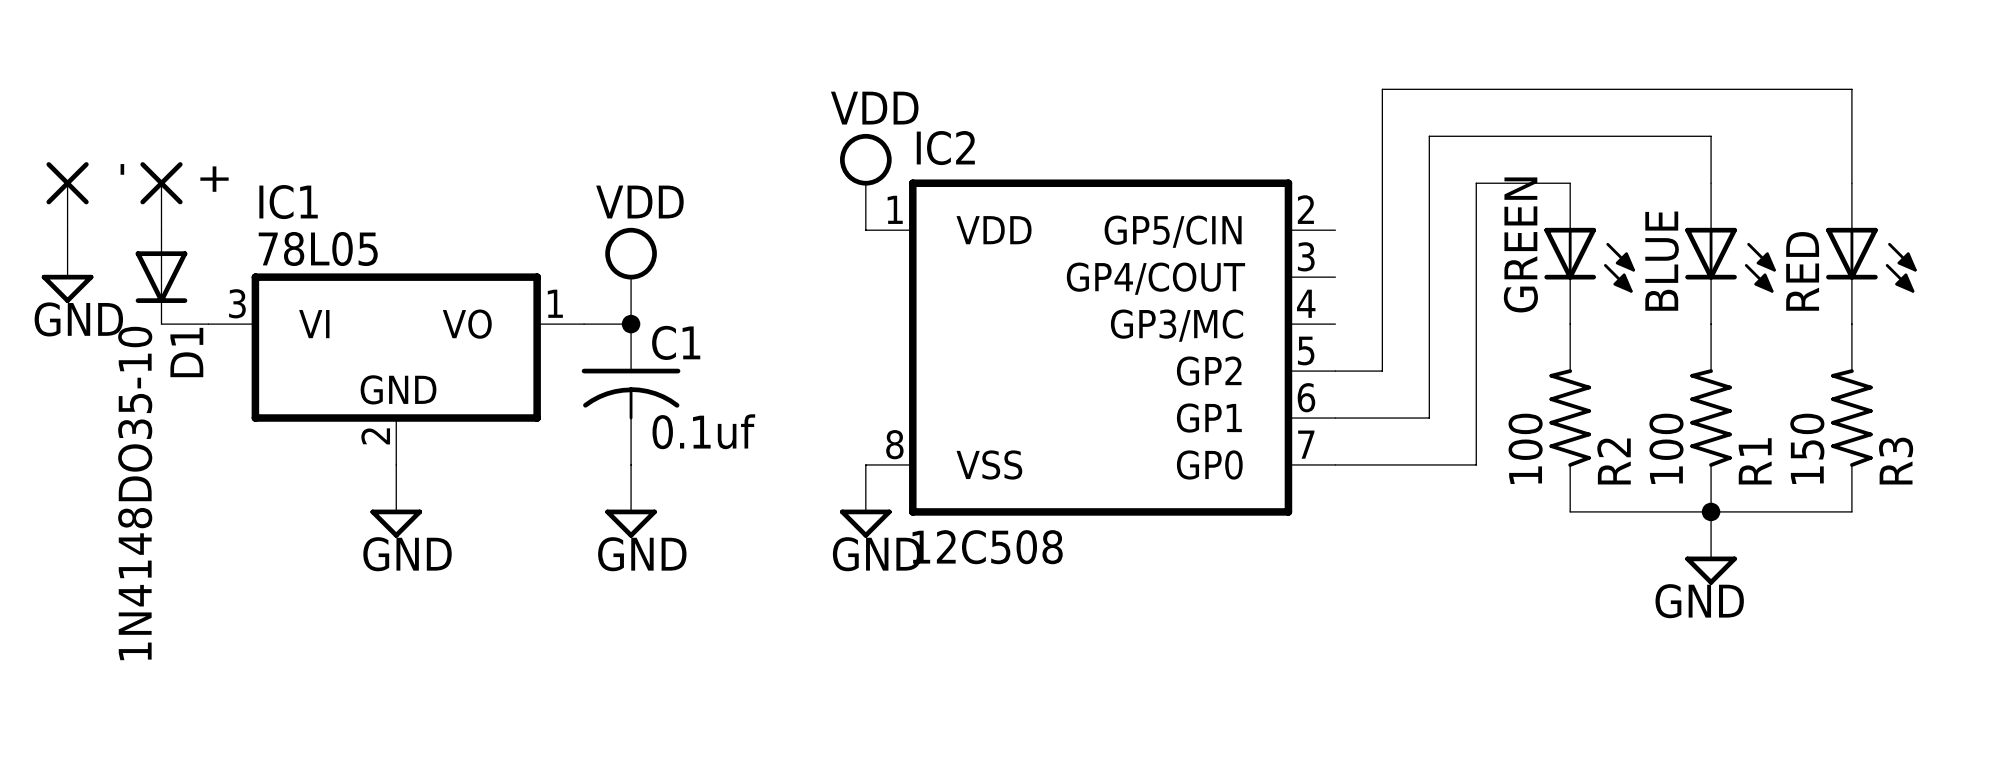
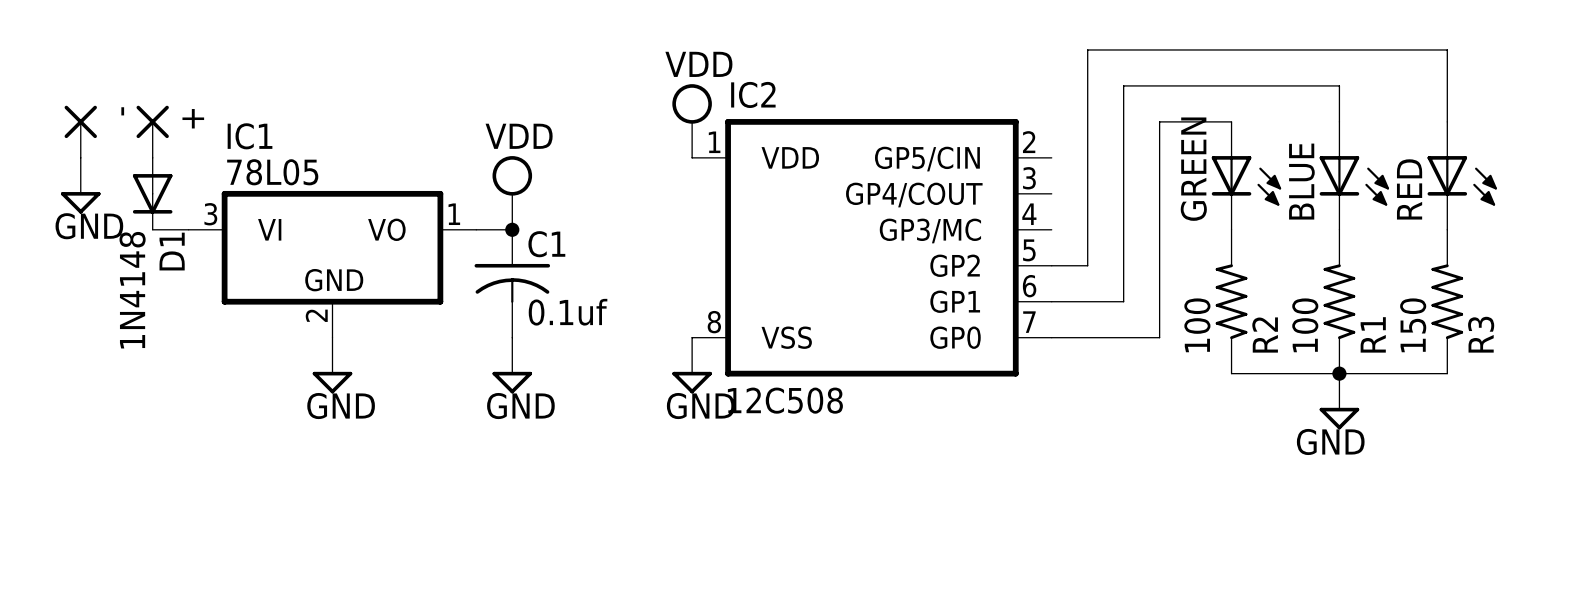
D1 value: 1N4148DO35-10 (135, 493) -> 1N4148 (132, 290)

